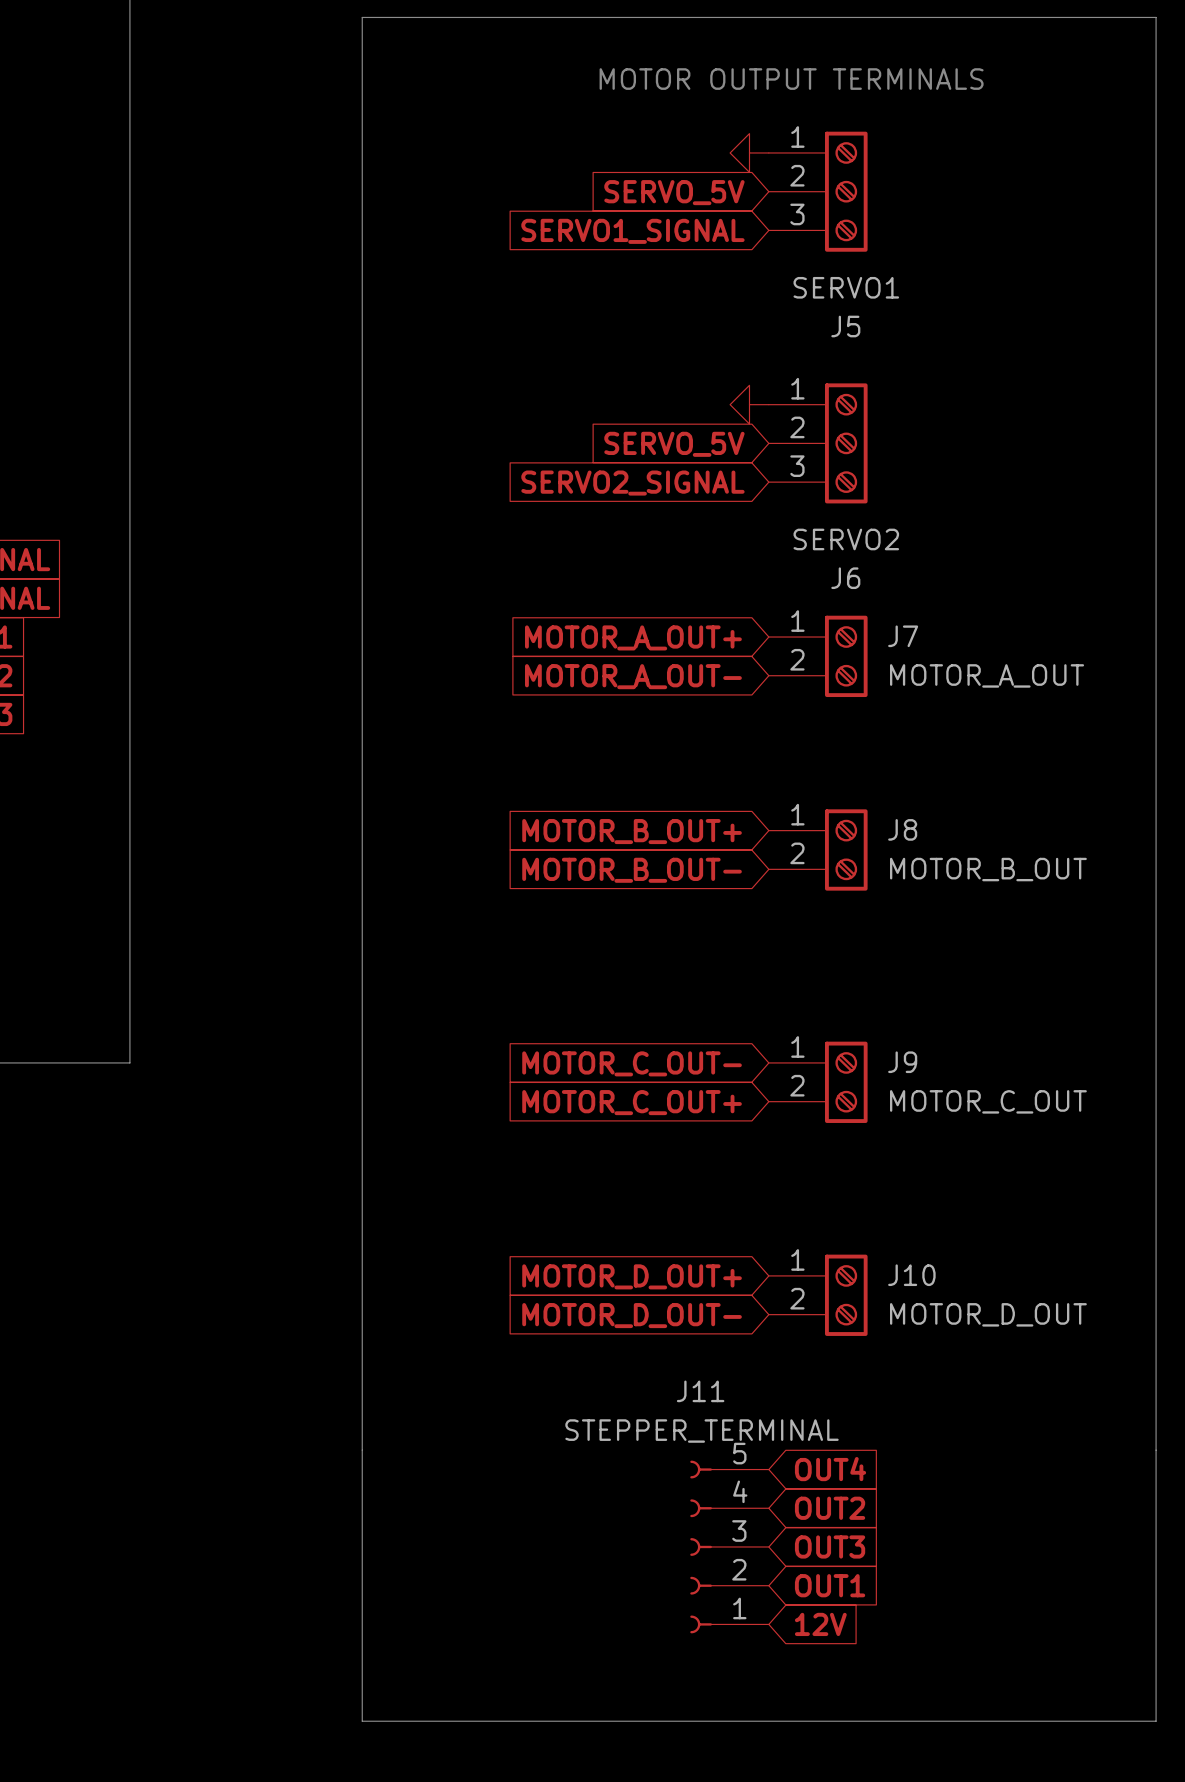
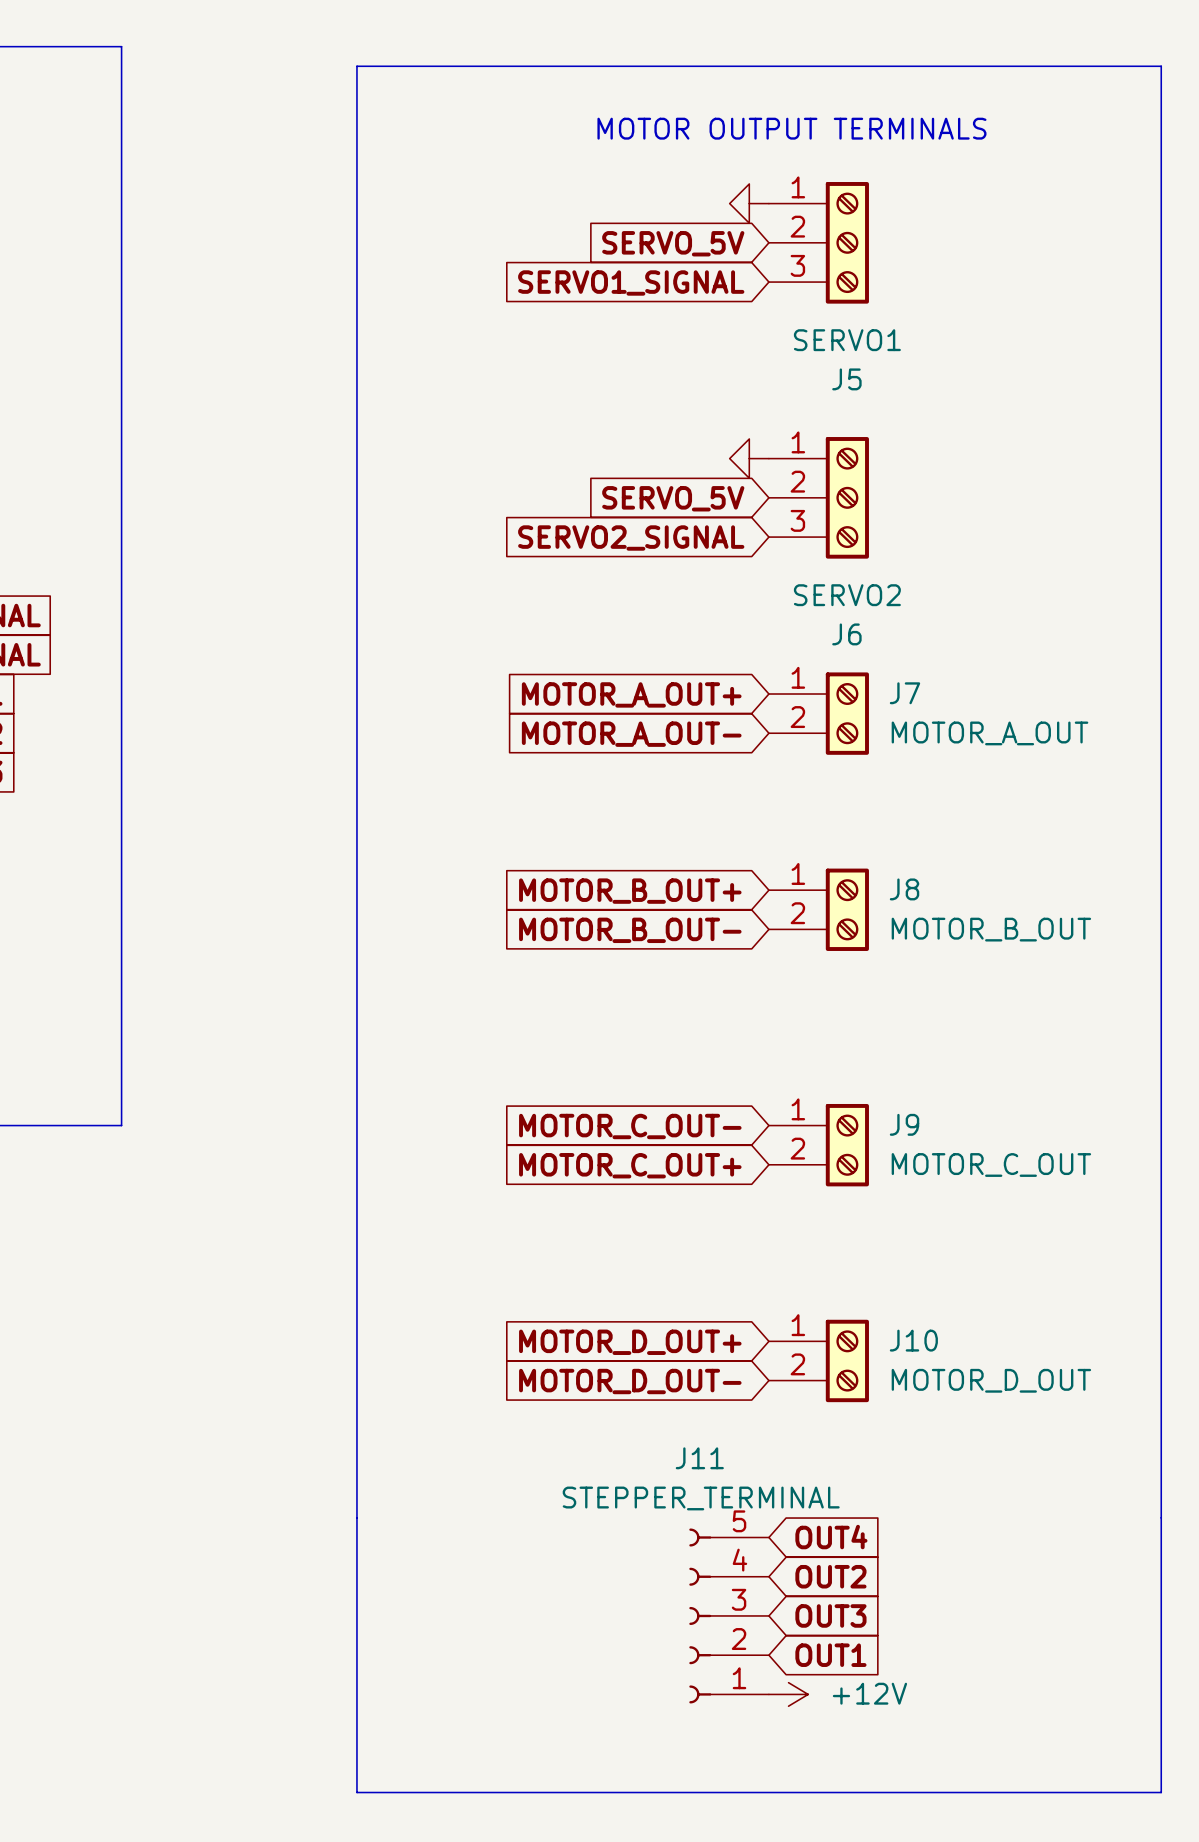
power symbol: none -> +12V (788, 1694)
global label: 12V (820, 1624) -> none

